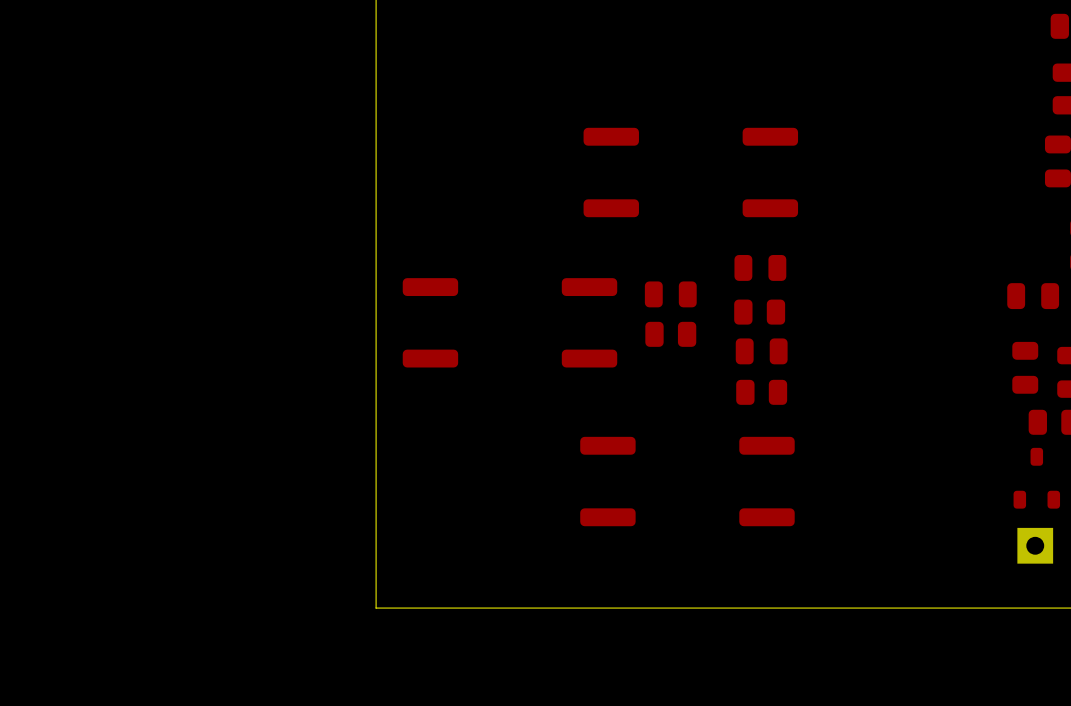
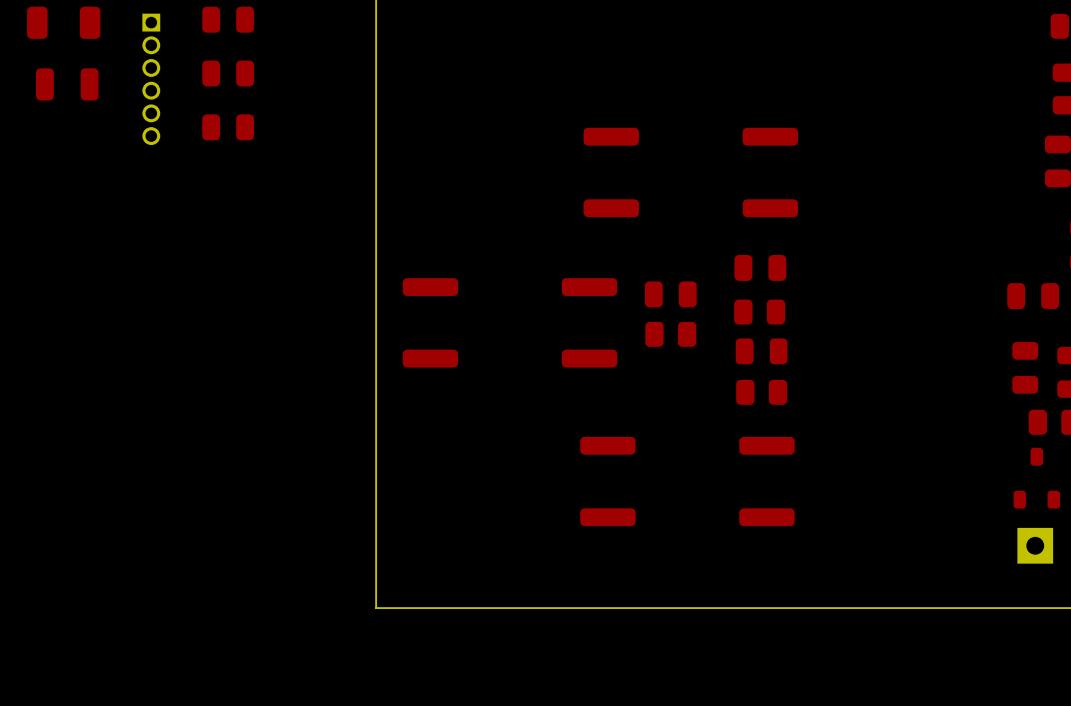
part: none -> (228, 19)
part: none -> (63, 22)
part: none -> (228, 73)
part: none -> (151, 79)
part: none -> (67, 84)
part: none -> (228, 127)

